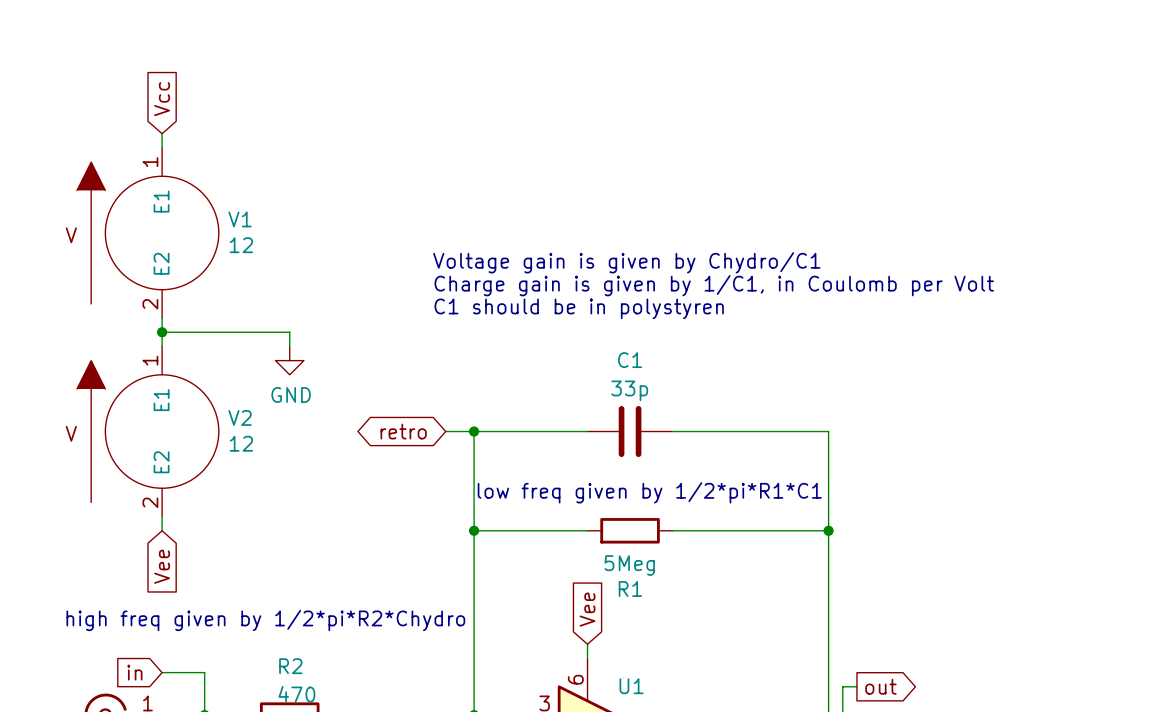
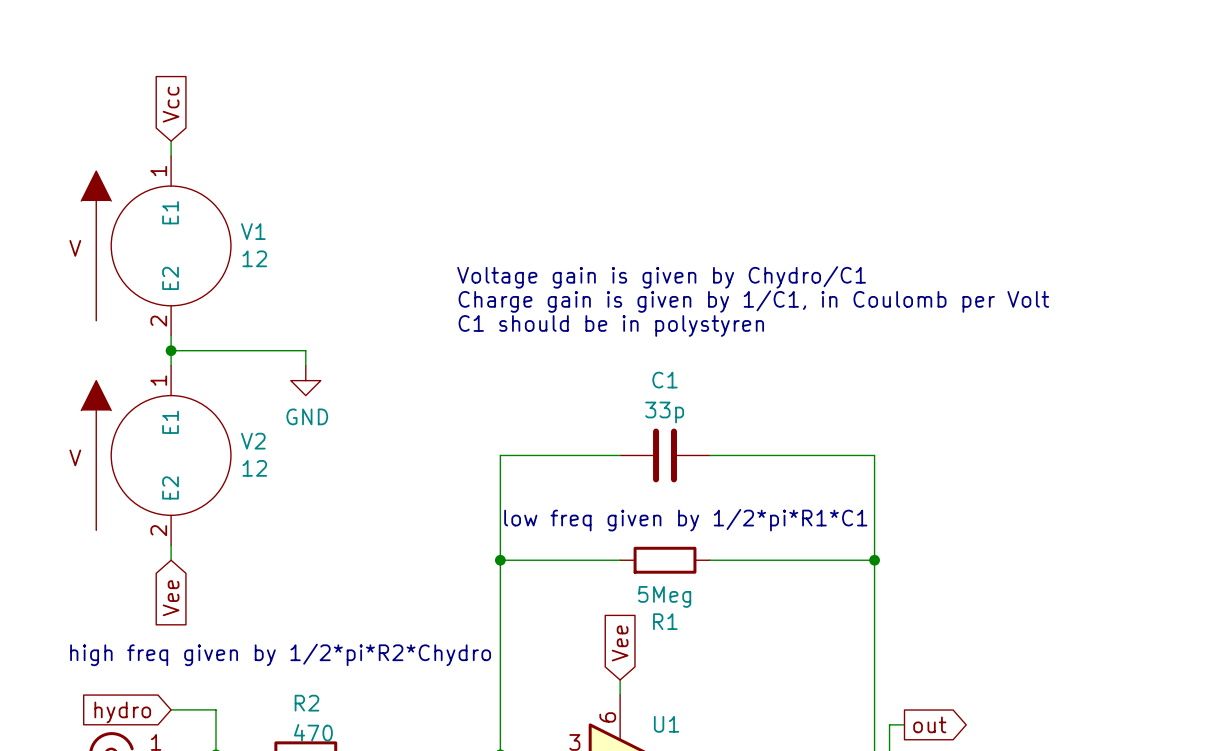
global label: retro (403, 431) -> none
wire: (445, 431) (474, 431) -> none
junction: (474, 431) -> none
global label: in (134, 672) -> hydro (122, 712)

